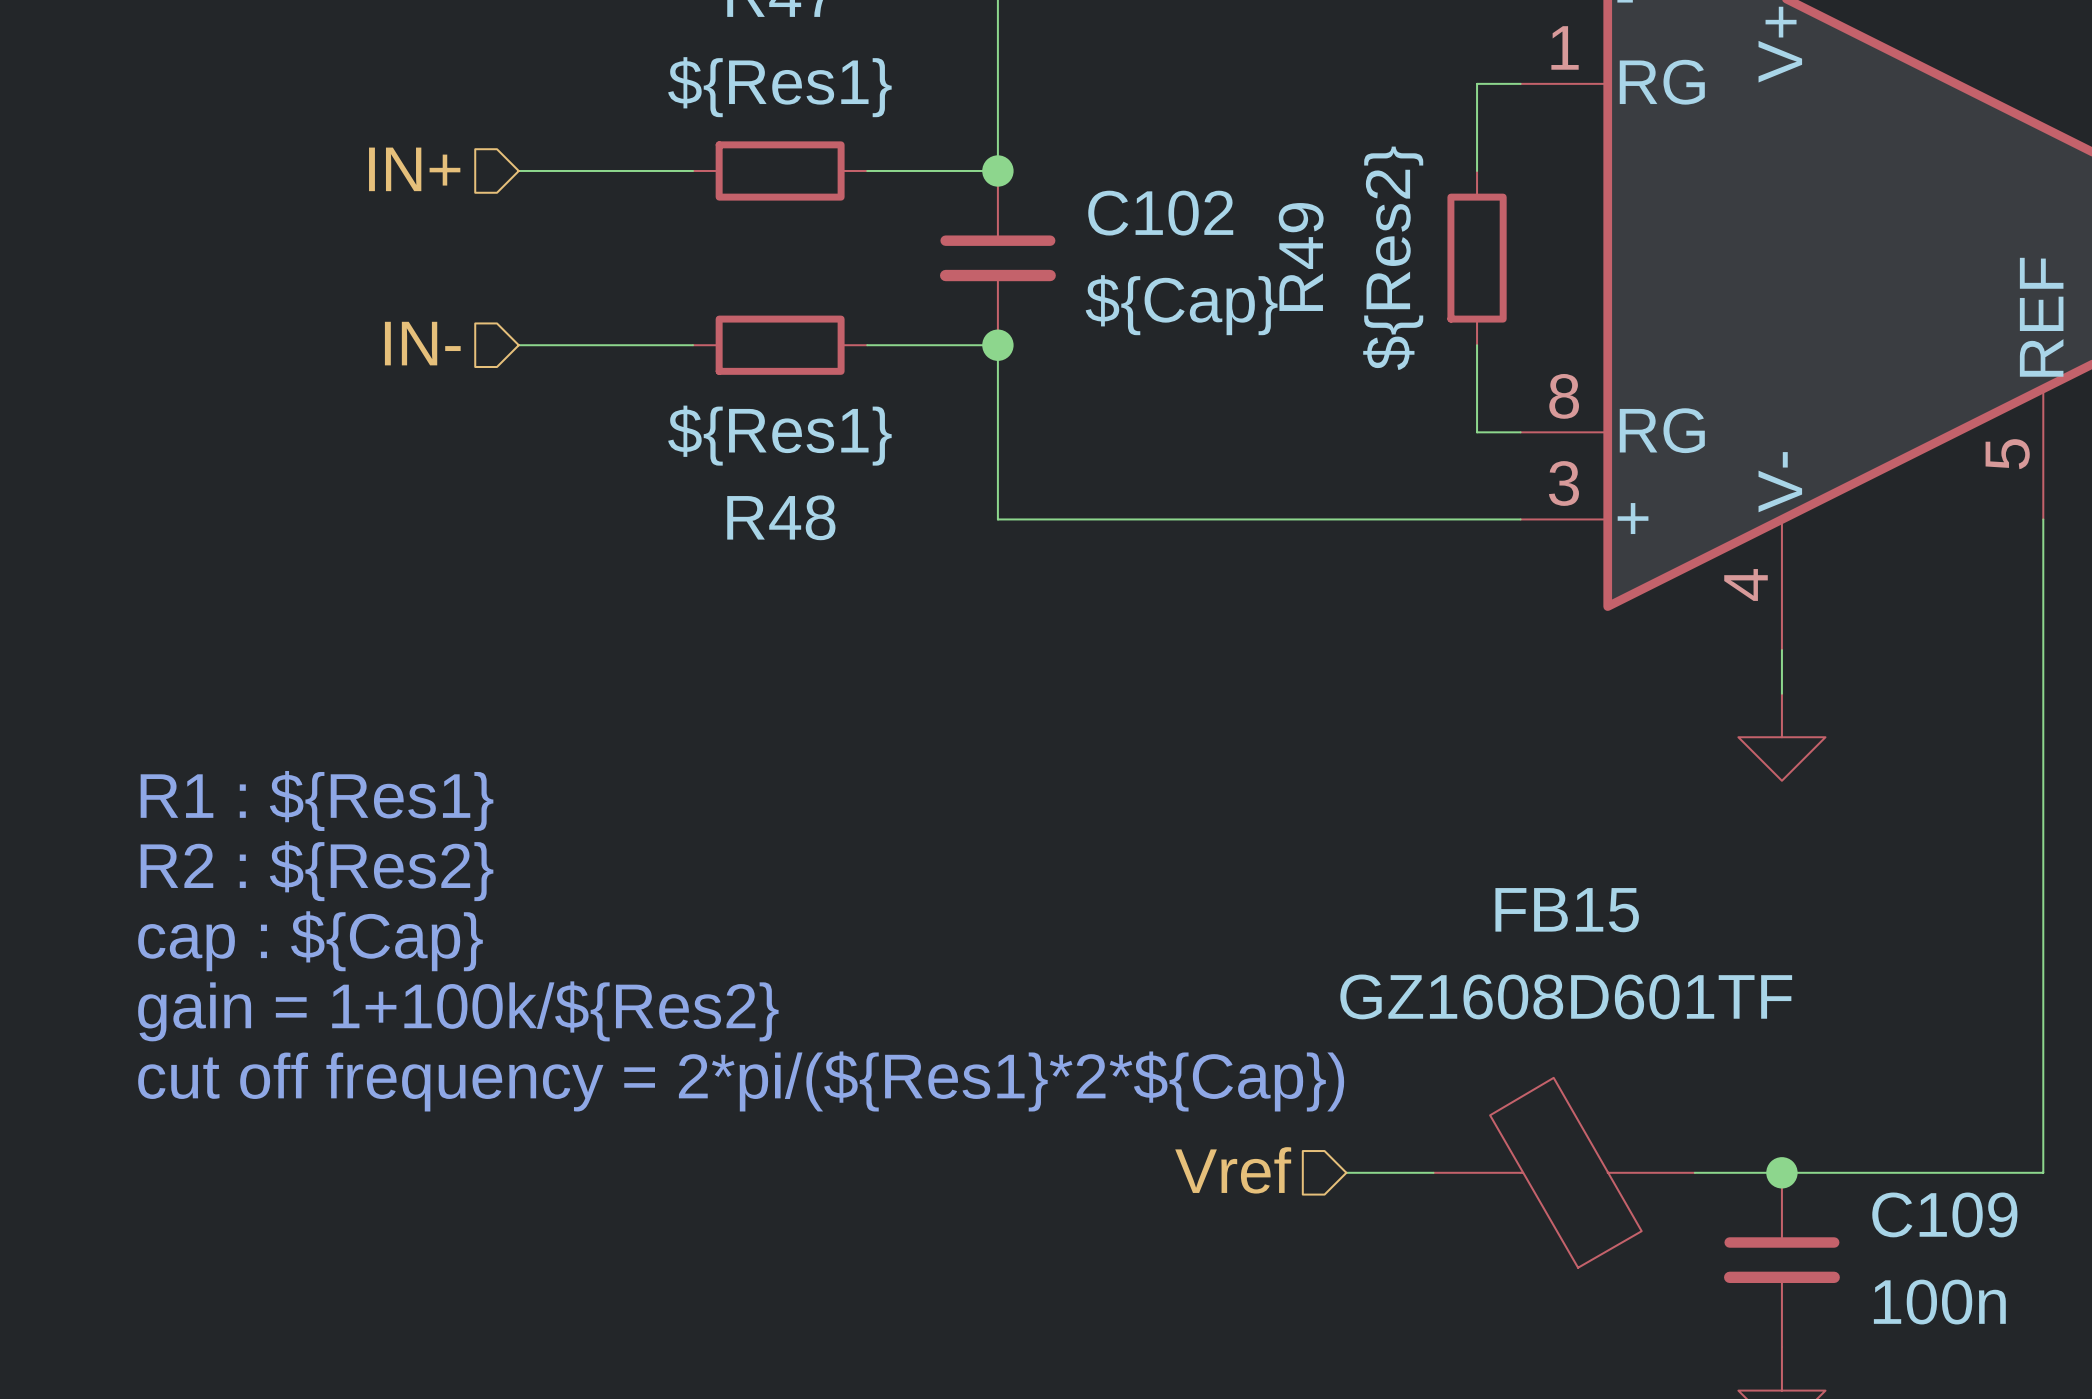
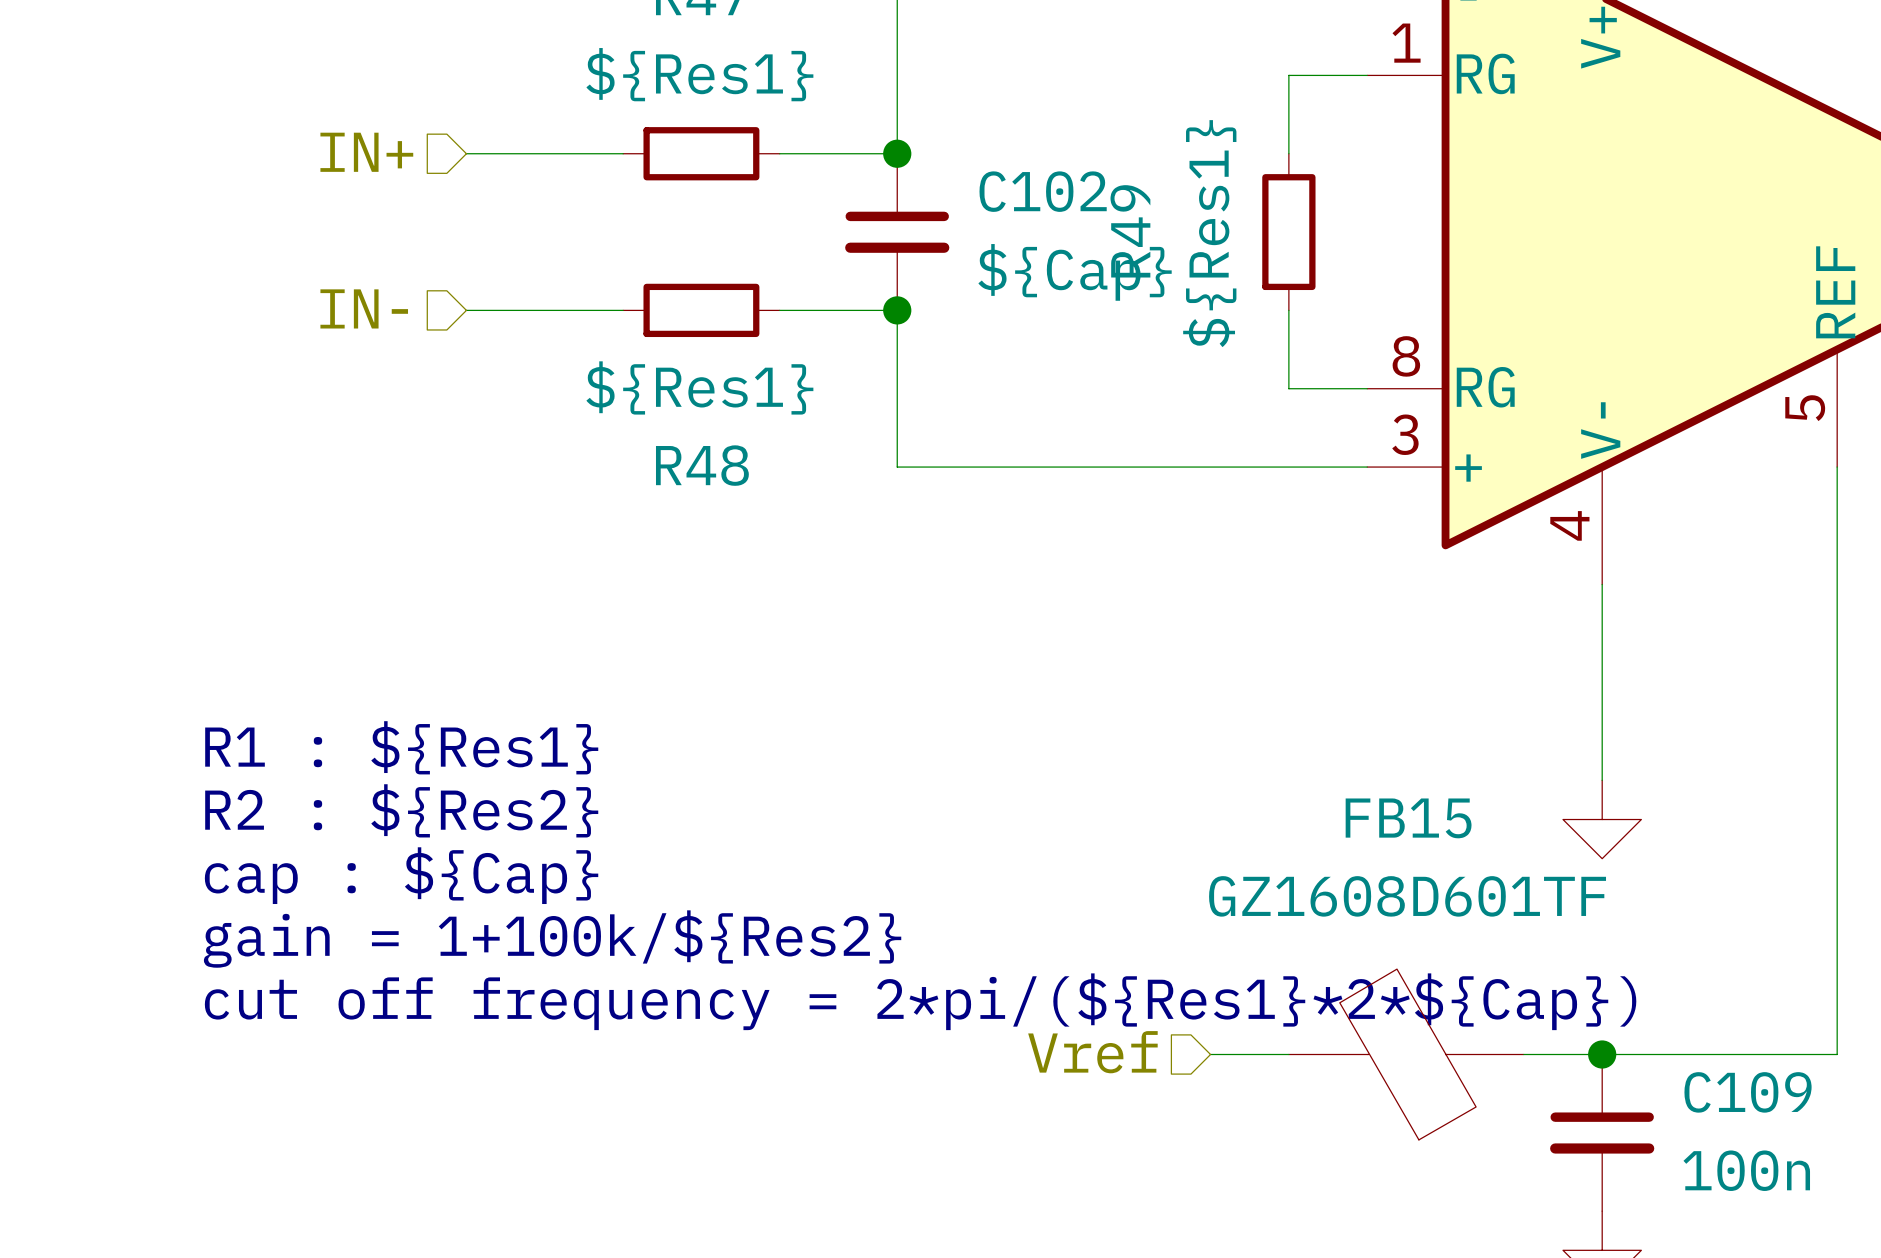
wire: (1477, 83) (1477, 170) -> (1328, 75) (1288, 75) (1288, 153)
R49 value: ${Res2} (1393, 258) -> ${Res1} (1209, 233)
R49 position: (1477, 258) -> (1288, 232)
wire: (1477, 345) (1477, 432) -> (1288, 310) (1288, 388) (1328, 388)
wire: none -> (1602, 623) (1602, 780)
power symbol position: (1781, 737) -> (1602, 819)
text position: R1 : ${Res1} (317, 800) -> R1 : ${Res1} (401, 747)
text position: R2 : ${Res2} (317, 871) -> R2 : ${Res2} (401, 810)
text position: cap : ${Cap} (310, 941) -> cap : ${Cap} (401, 875)
text position: gain = 1+100k/${Res2} (458, 1011) -> gain = 1+100k/${Res2} (552, 939)
text position: cut off frequency = 2*pi/(${Res1}*2*${Cap}) (741, 1081) -> cut off frequency = 2*pi/(${Res1}*2*${Cap}) (920, 1001)

